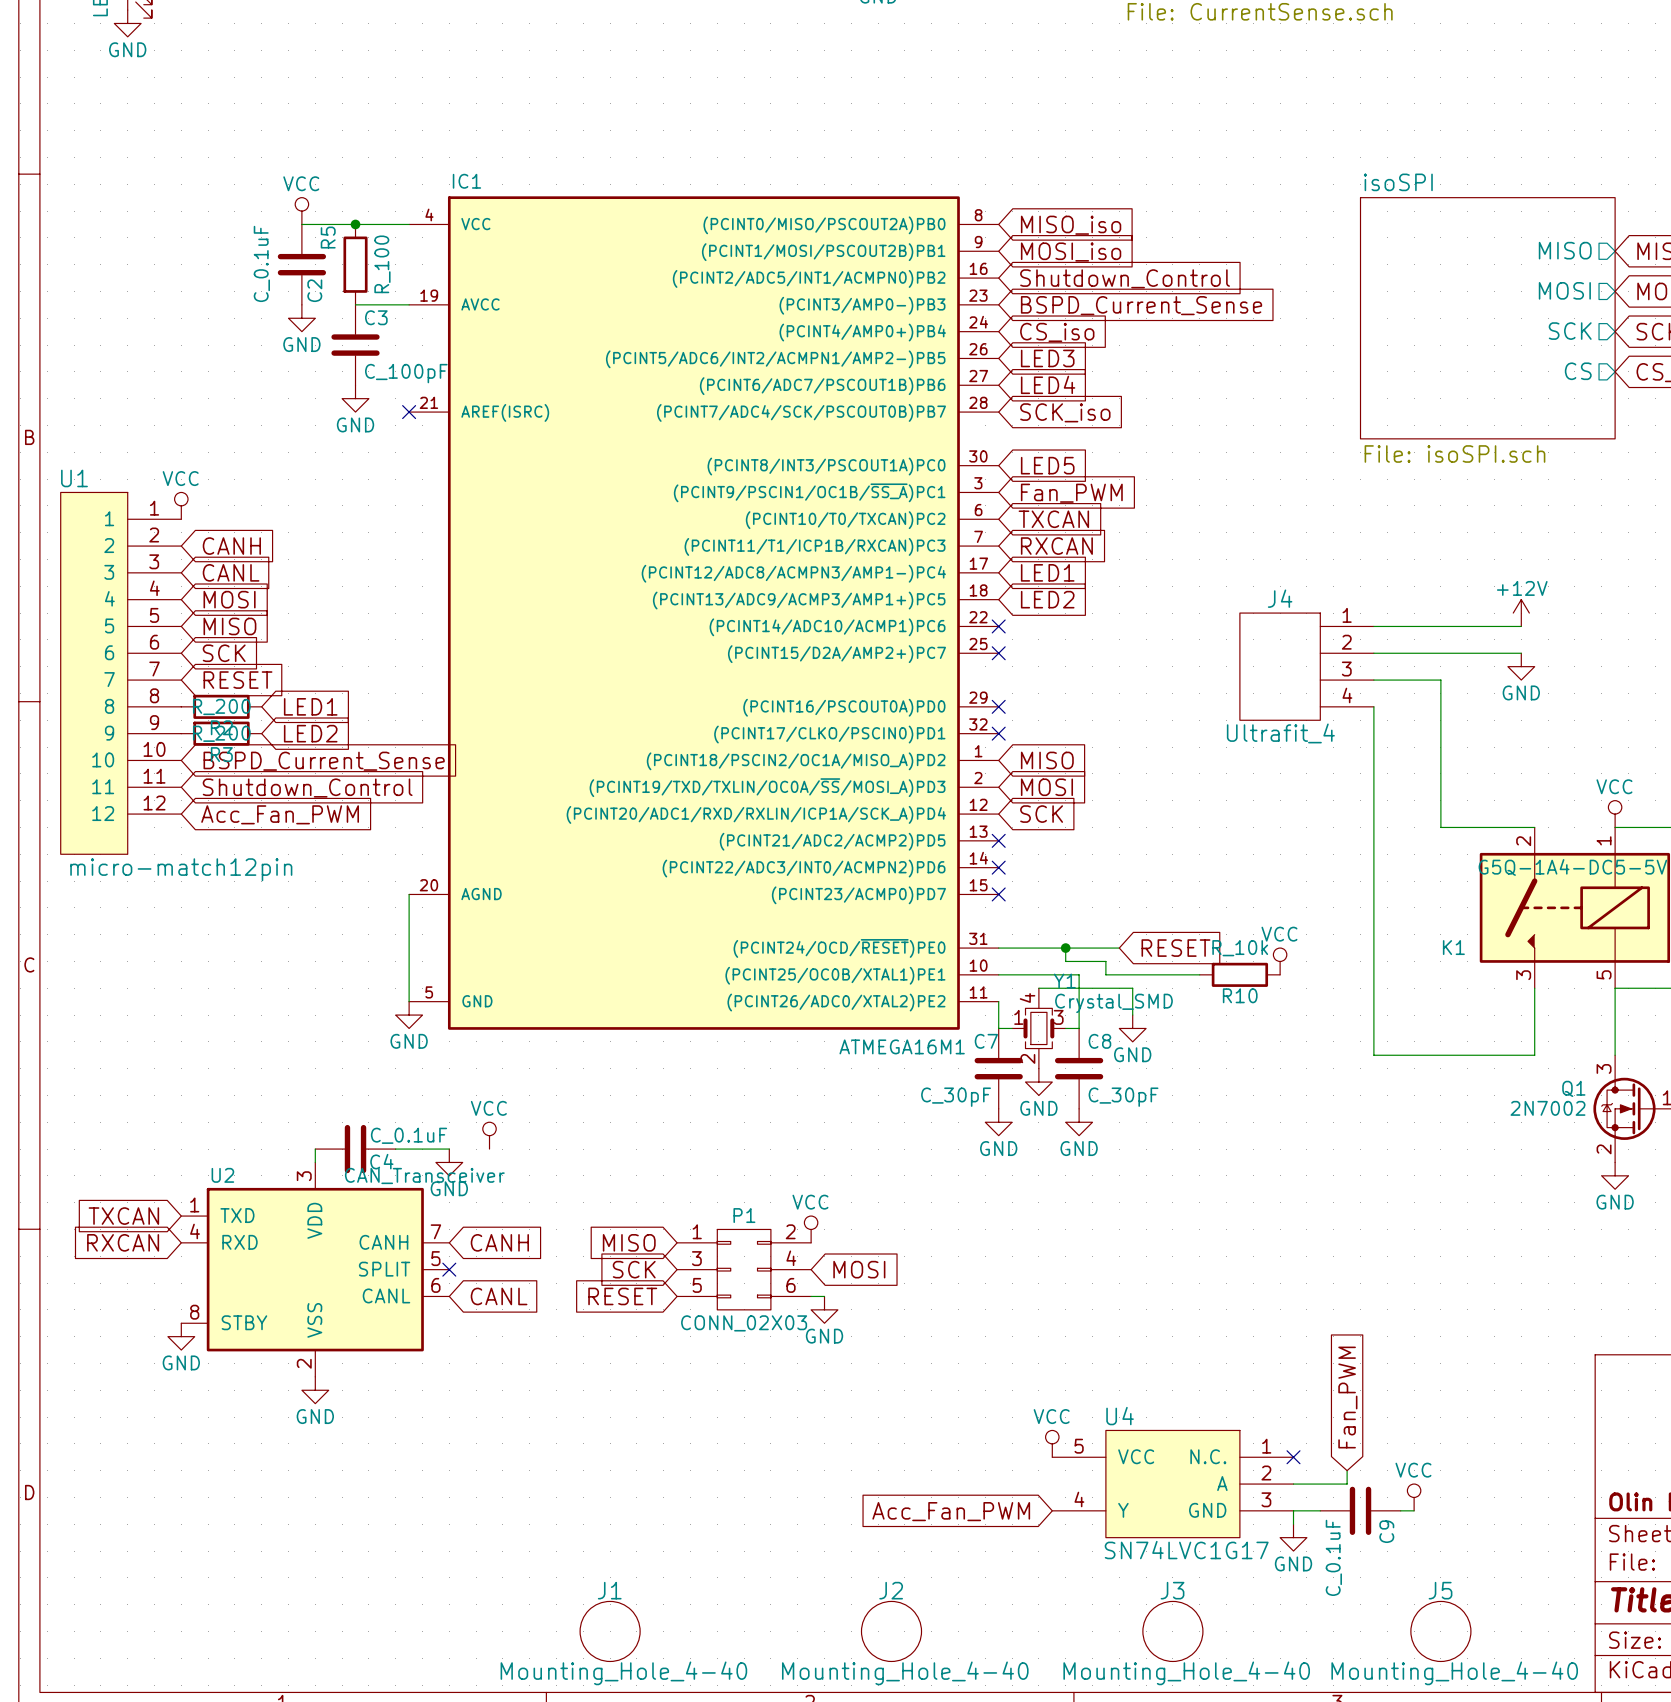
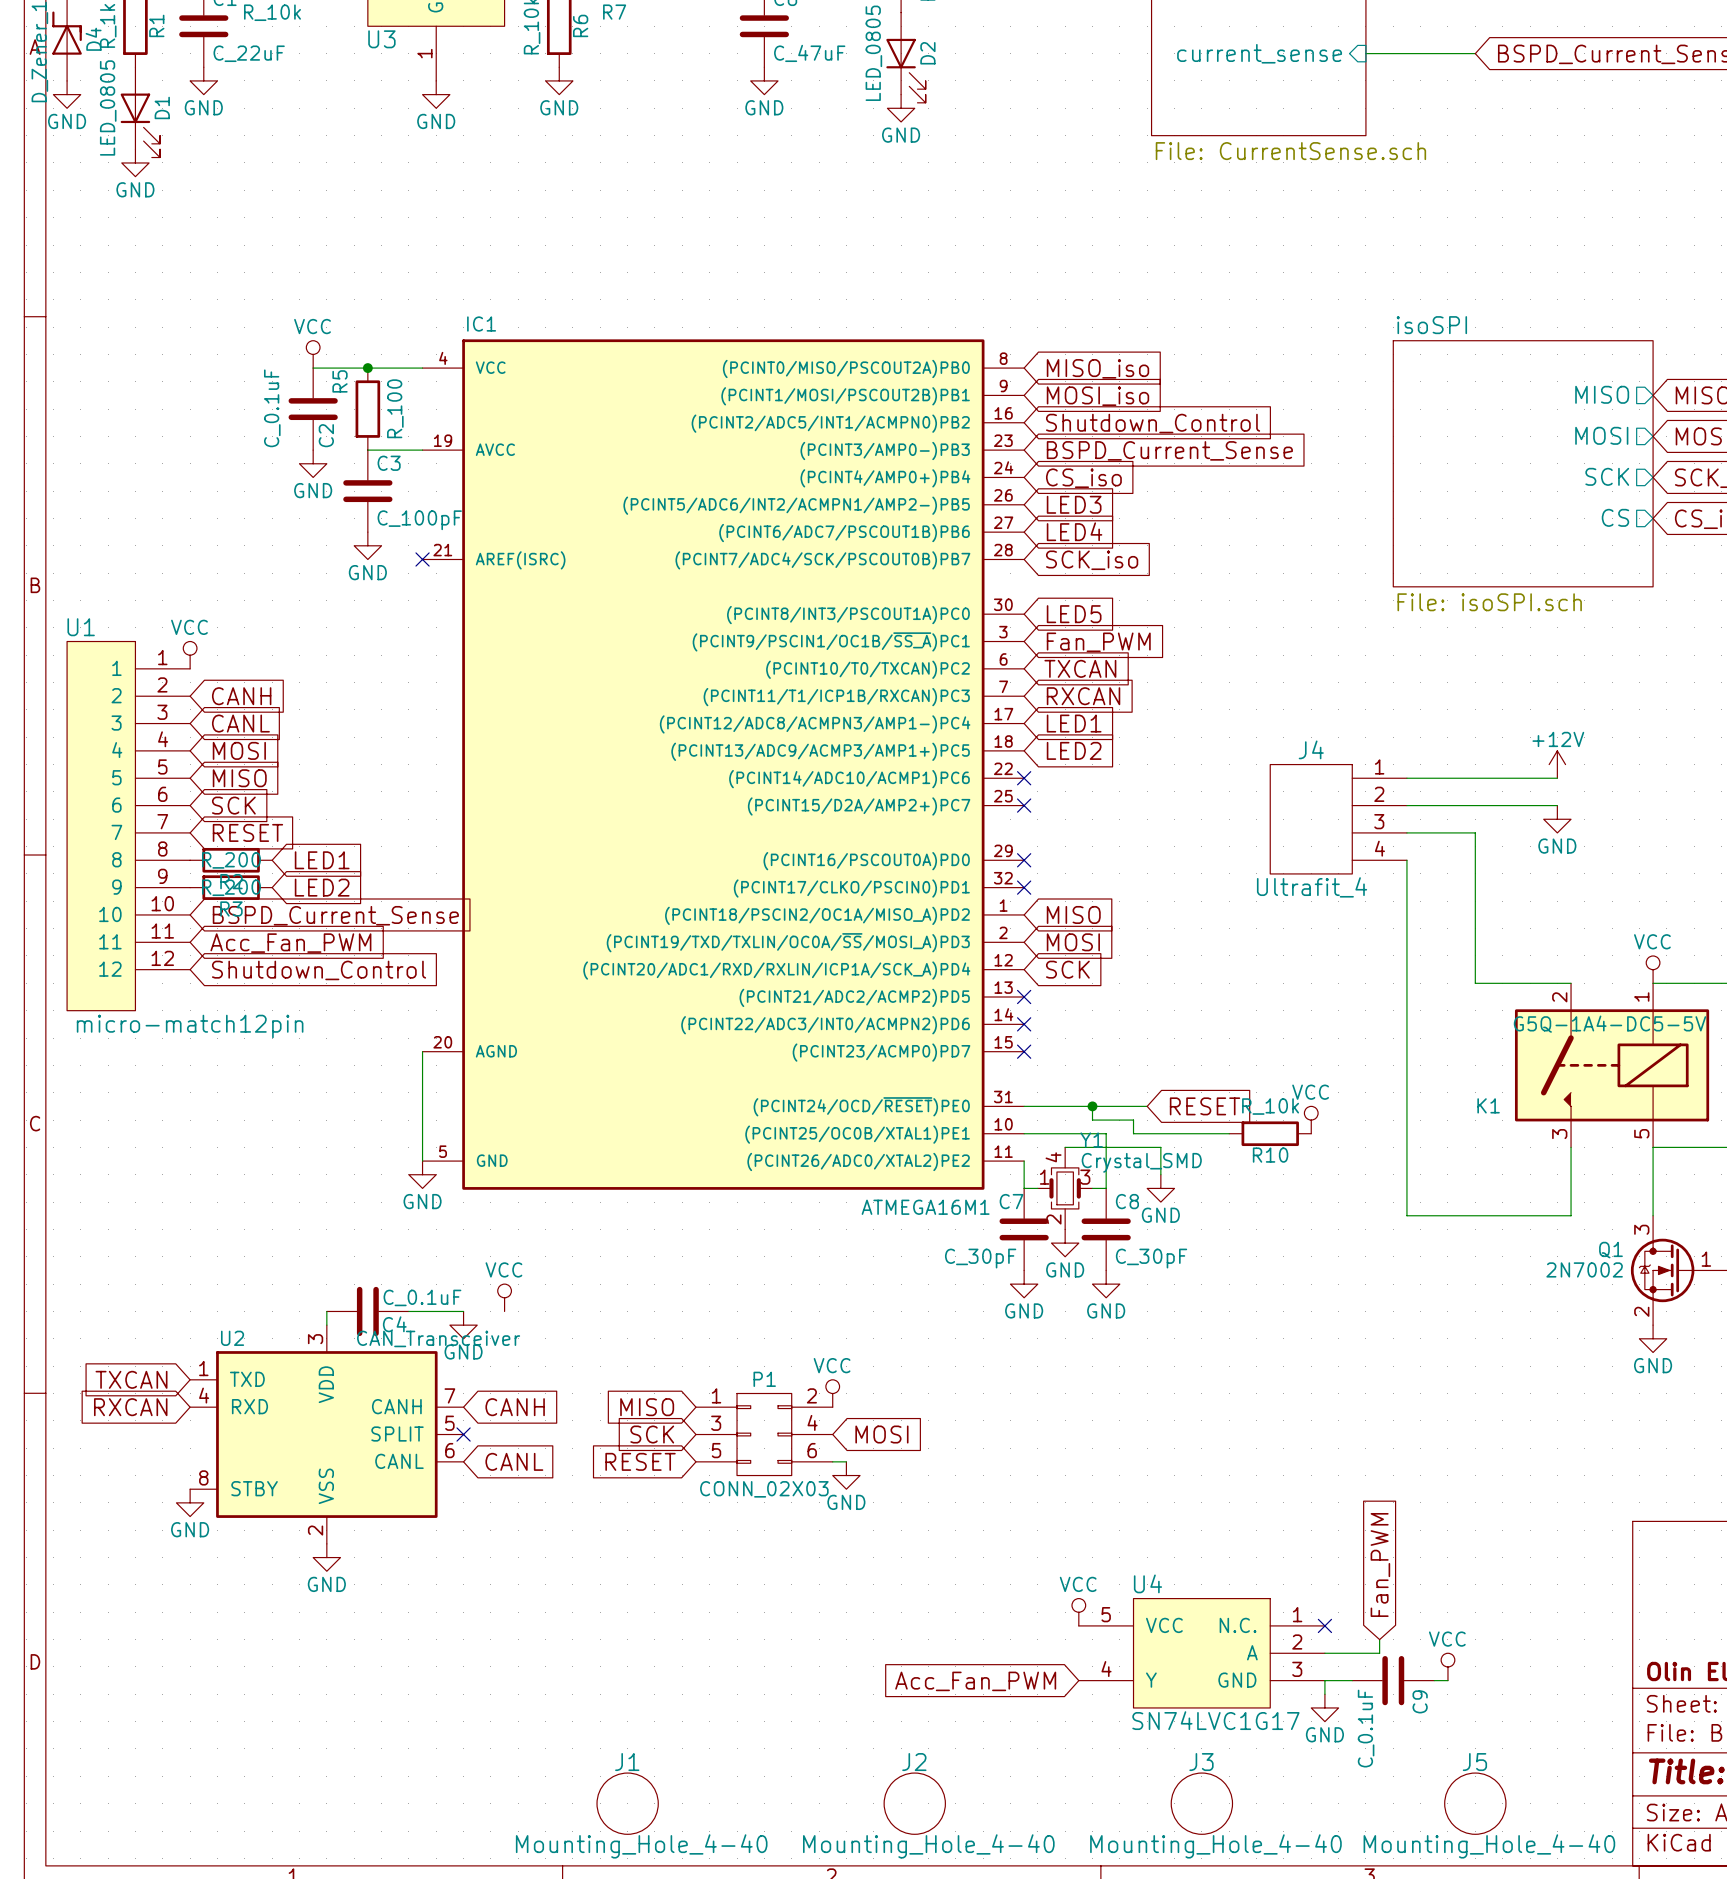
global label: Shutdown_Control (307, 788) -> Acc_Fan_PWM (290, 943)
global label: Acc_Fan_PWM (280, 814) -> Shutdown_Control (319, 970)

